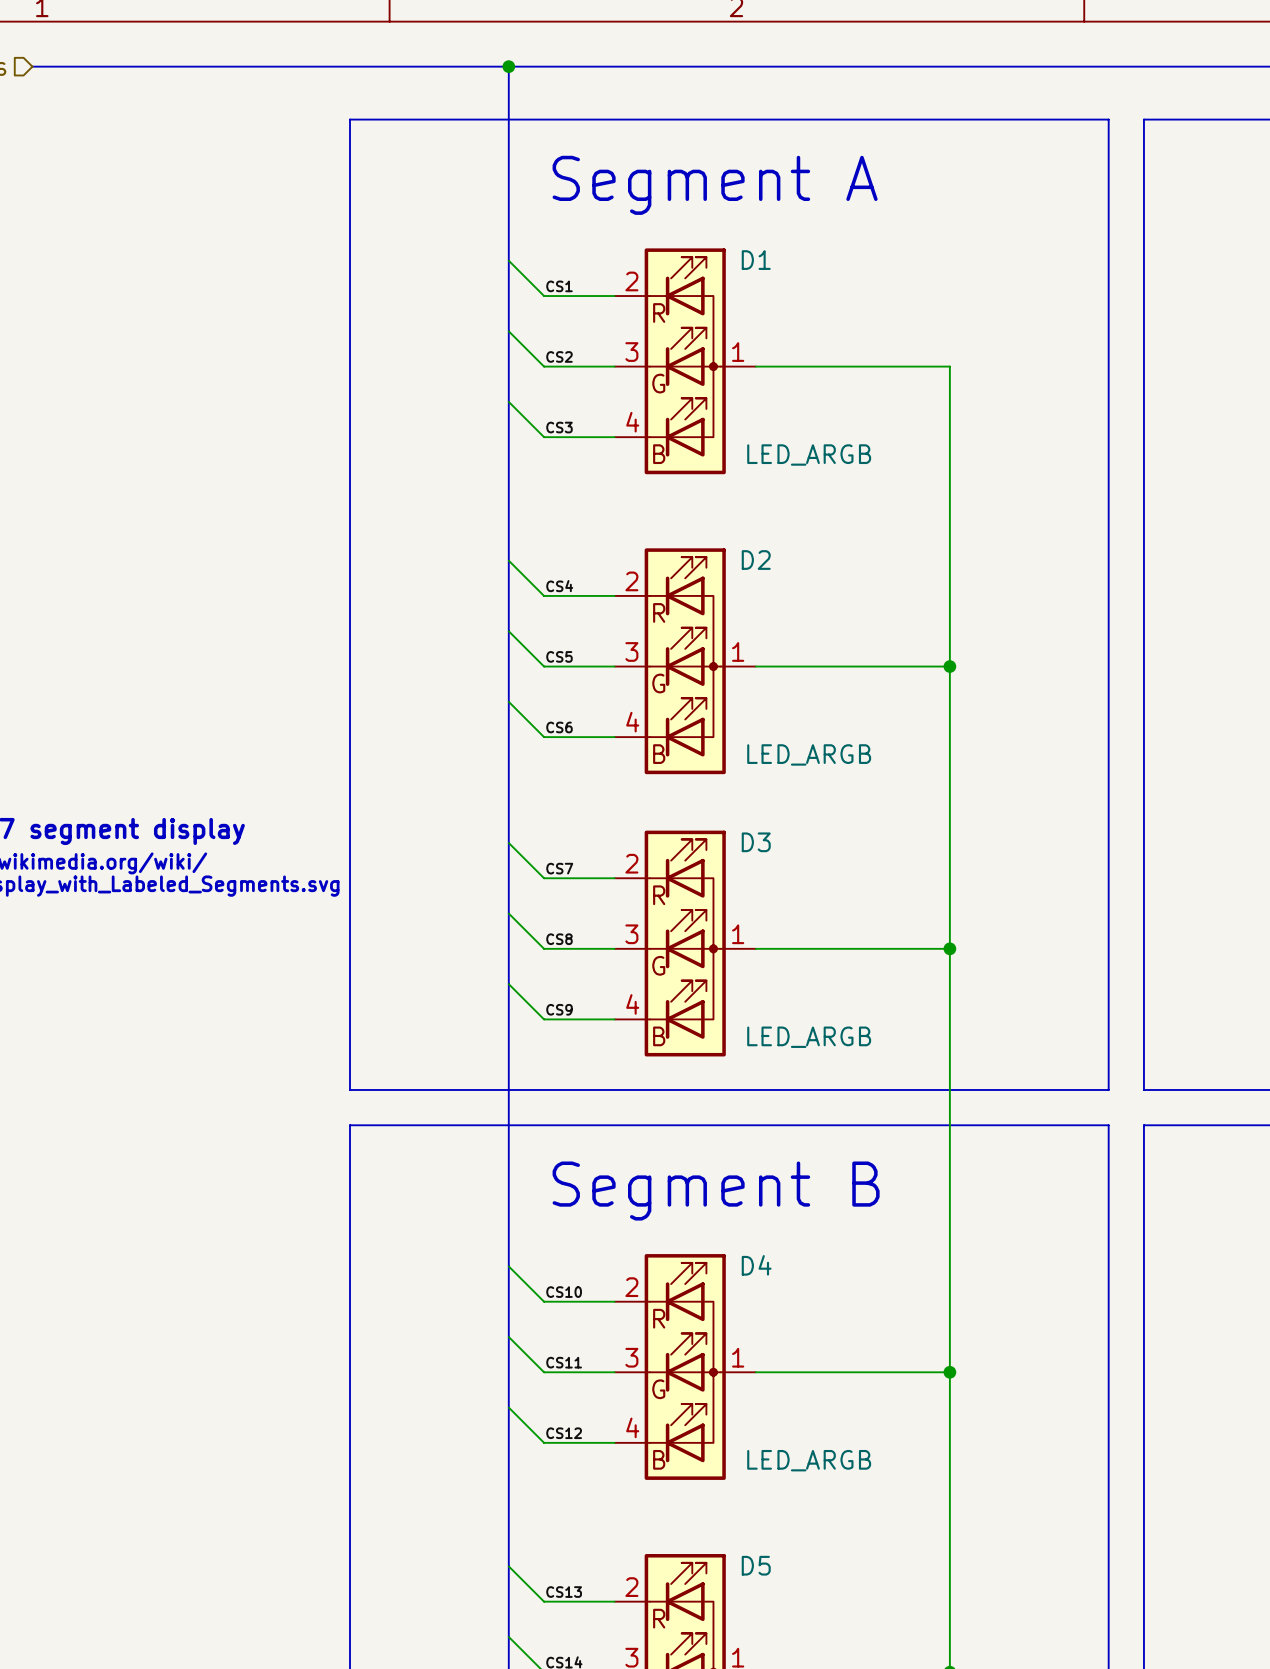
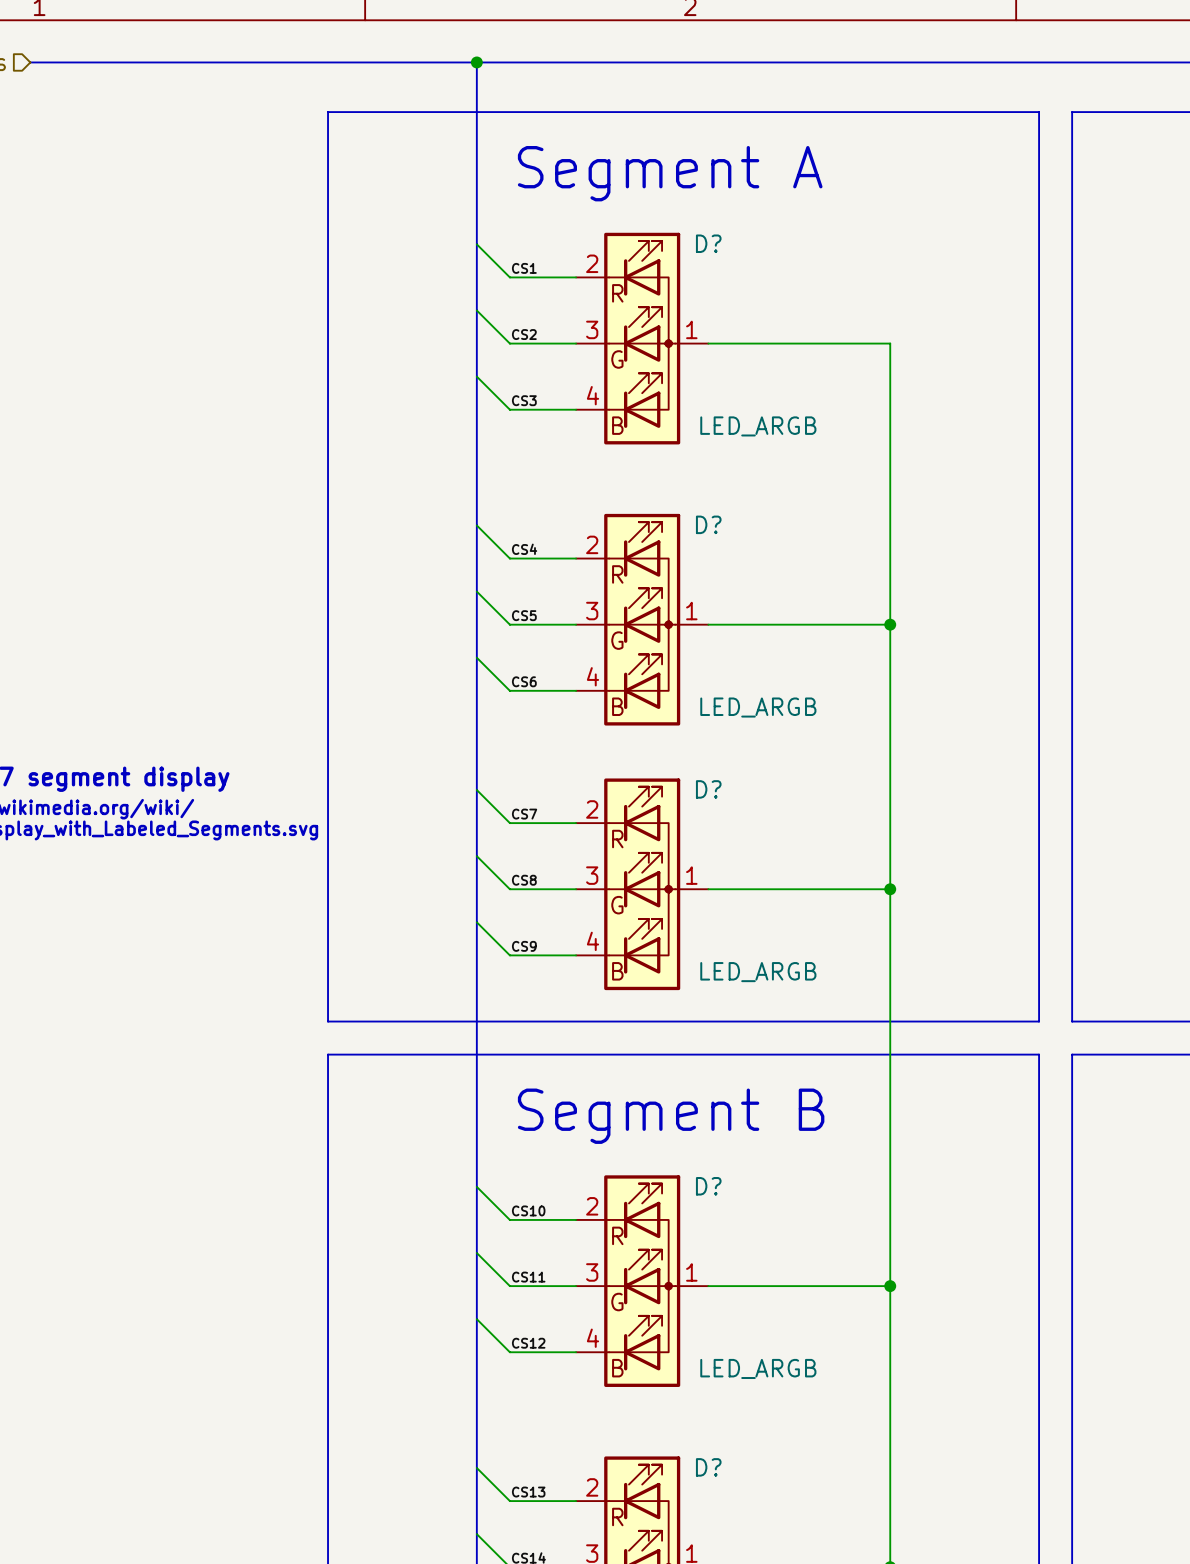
D1 name: D1 (756, 260) -> D? (708, 243)
D2 name: D2 (756, 560) -> D? (708, 524)
D3 name: D3 (756, 842) -> D? (708, 789)
D4 name: D4 (756, 1265) -> D? (708, 1186)
D5 name: D5 (756, 1565) -> D? (708, 1467)

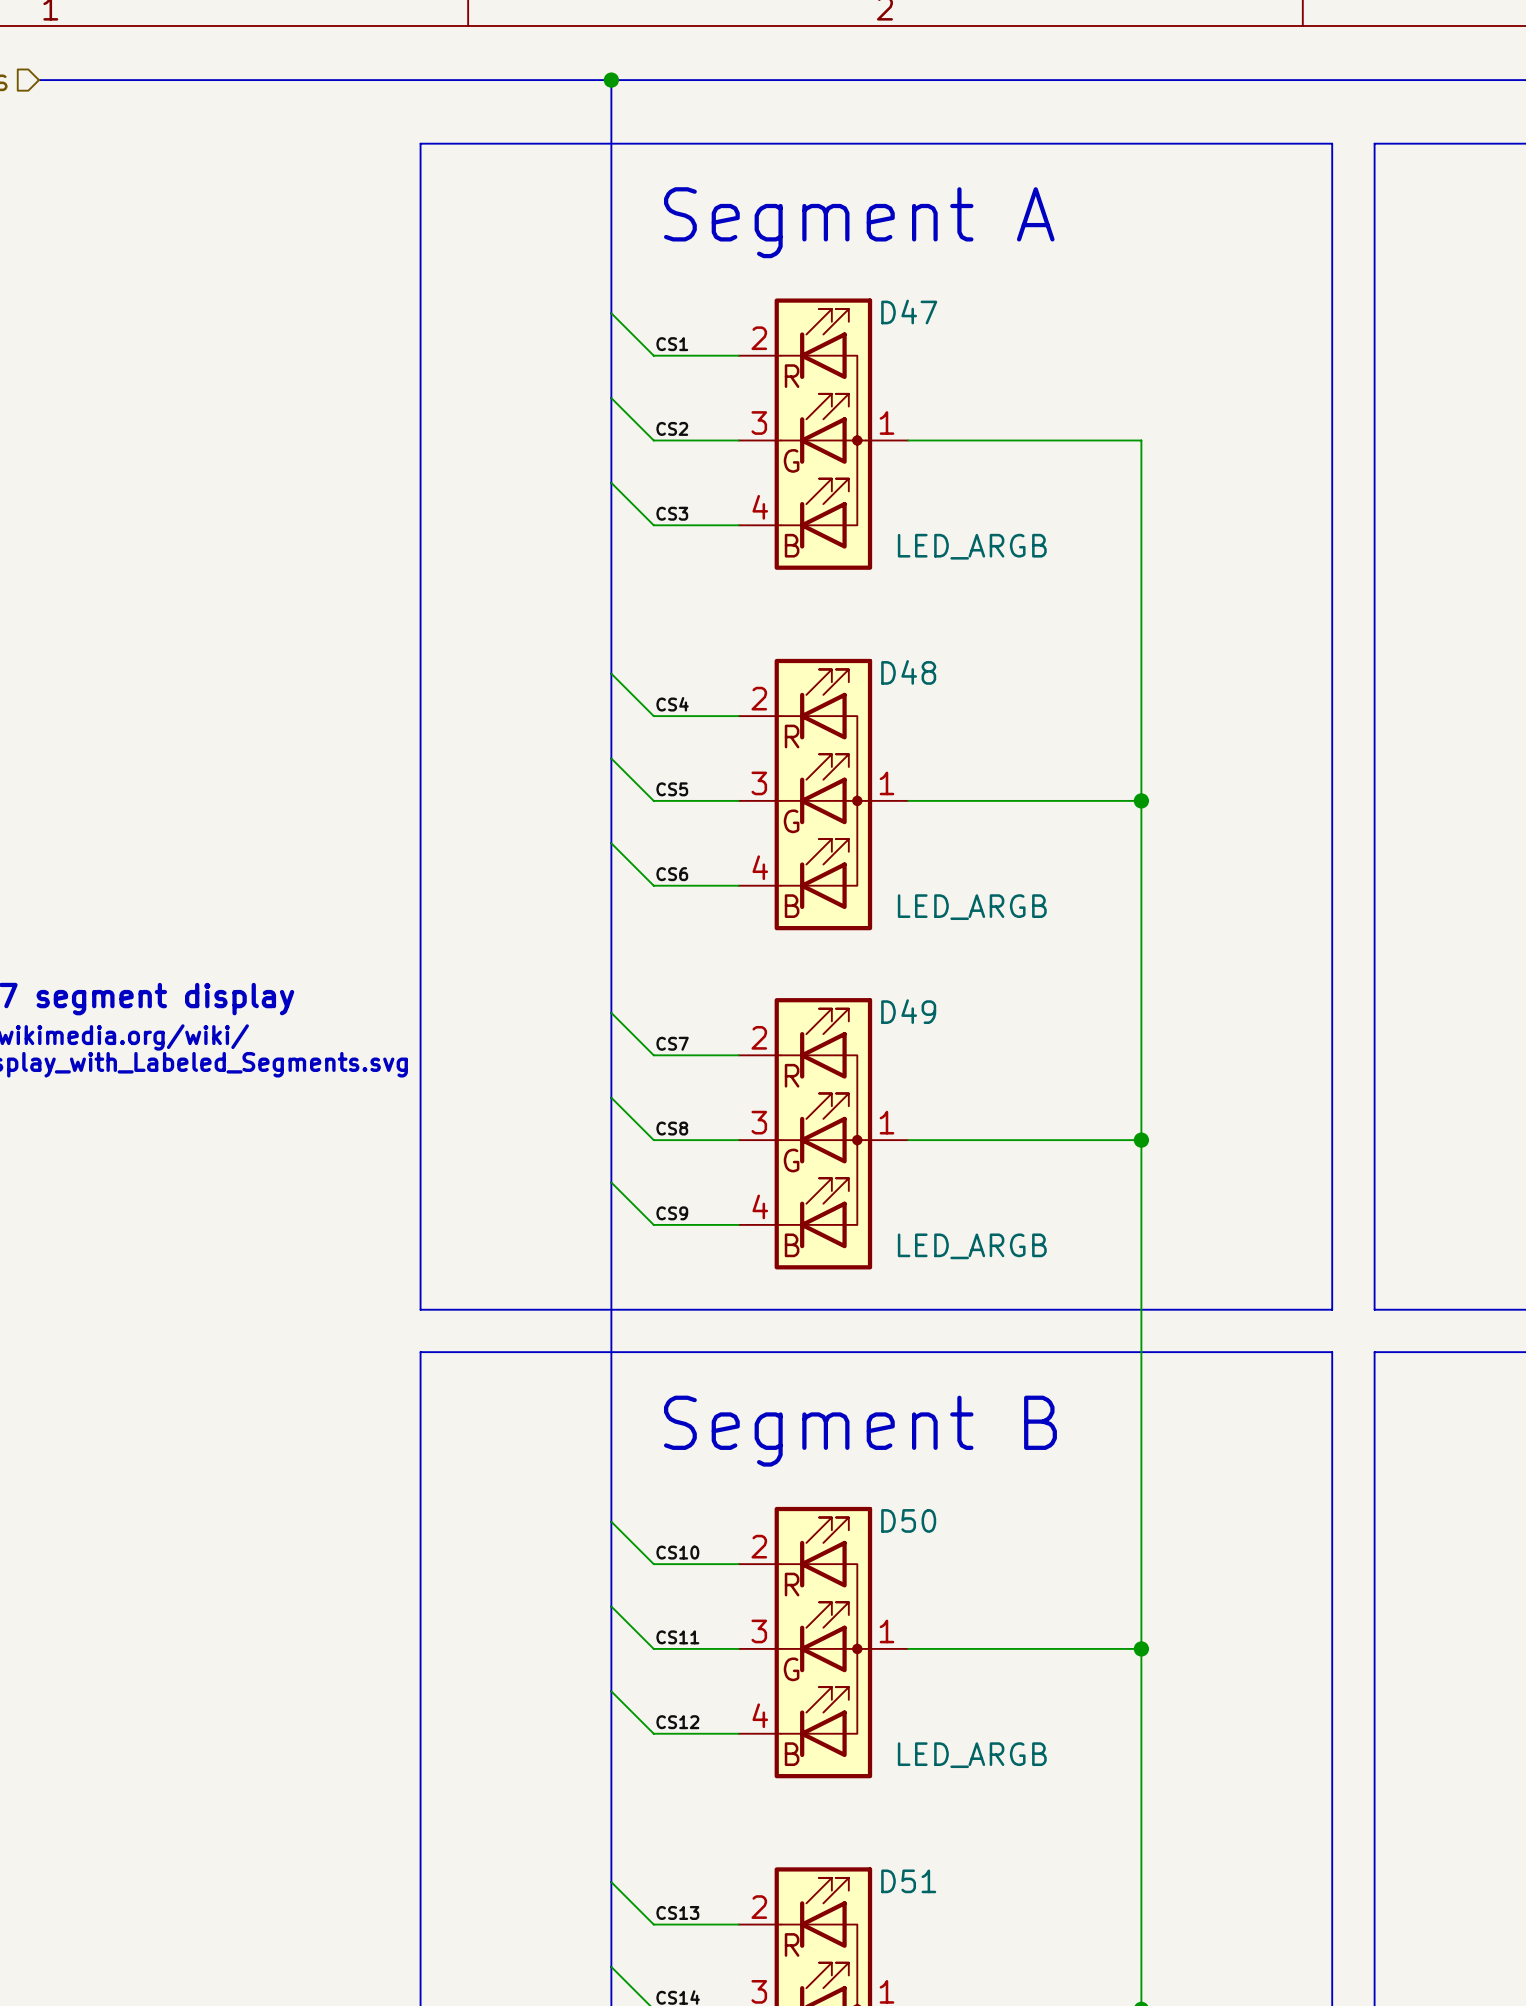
D? name: D? (708, 243) -> D47 (909, 311)
D? name: D? (708, 524) -> D48 (908, 672)
D? name: D? (708, 789) -> D49 (908, 1011)
D? name: D? (708, 1186) -> D50 (908, 1520)
D? name: D? (708, 1467) -> D51 (908, 1881)

